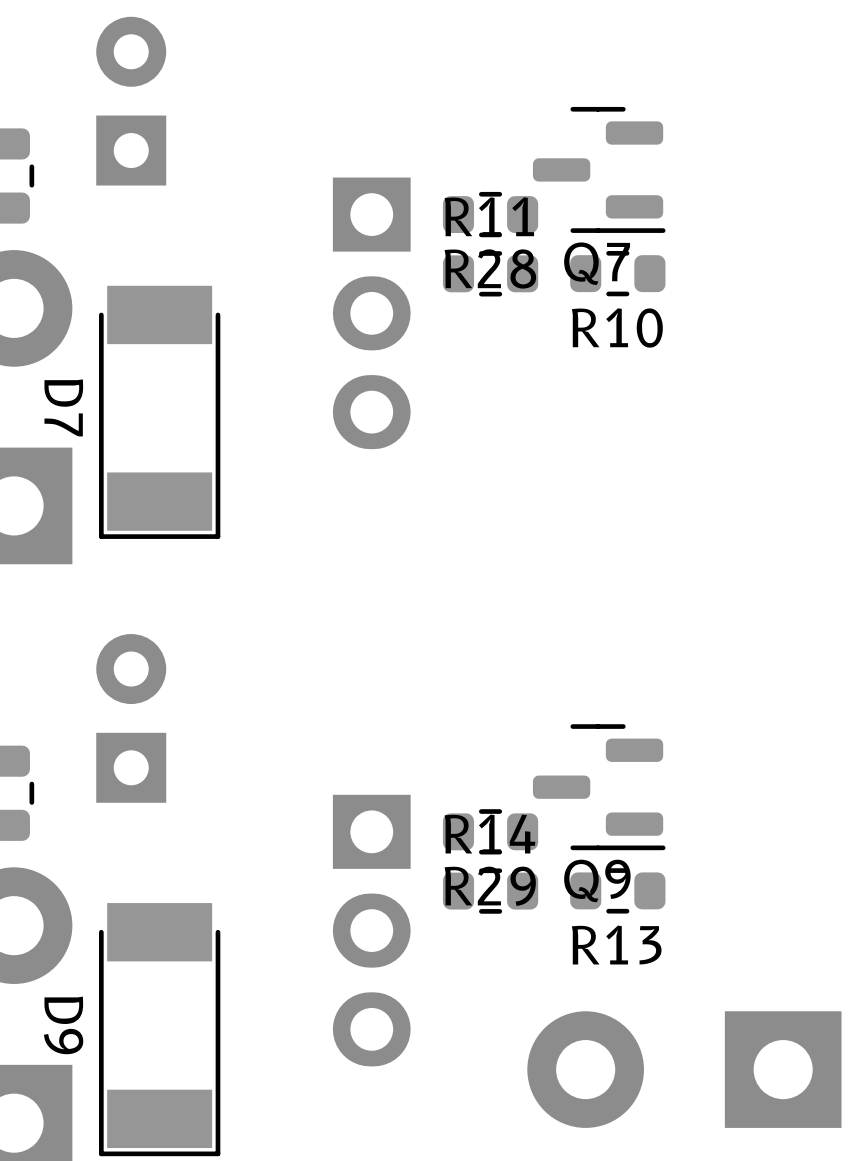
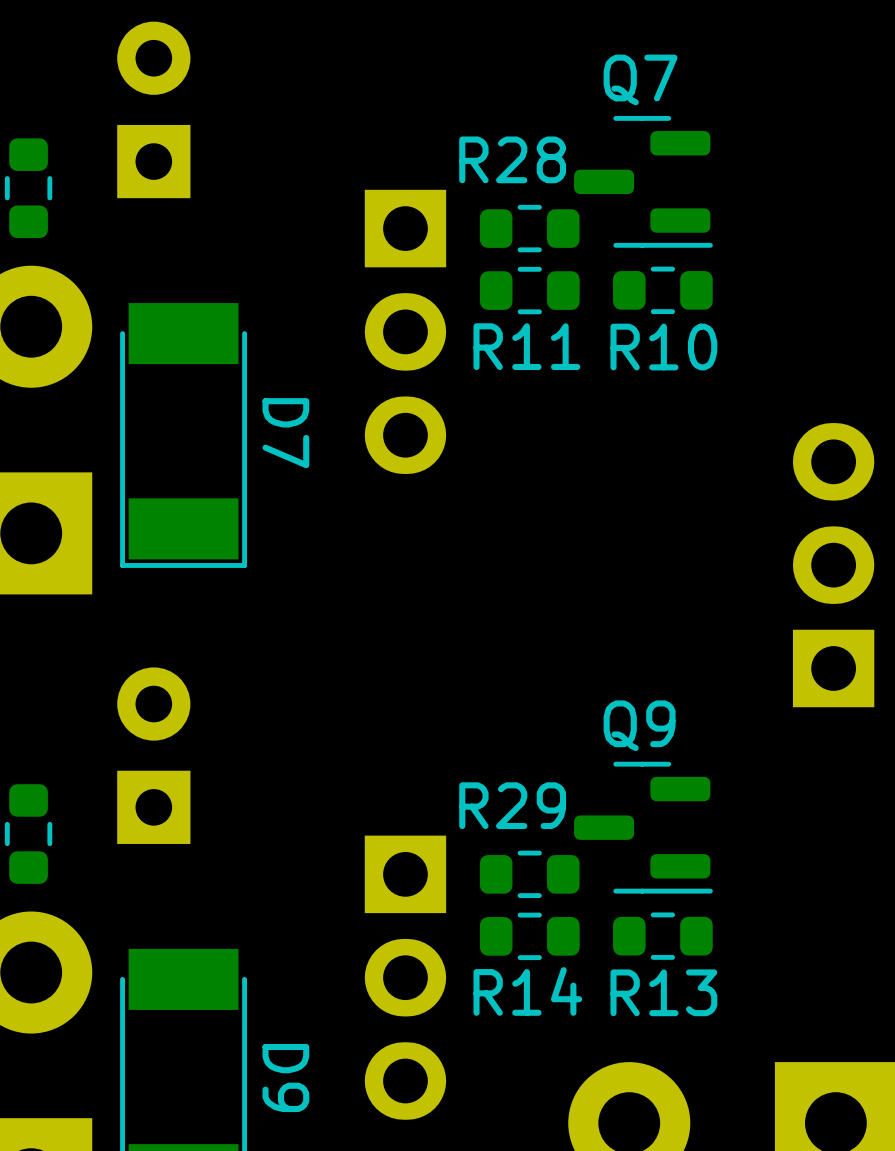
R11 name position: R11 (489, 216) -> R11 (526, 346)
Q7 name position: Q7 (597, 263) -> Q7 (640, 79)
R28 name position: R28 (490, 268) -> R28 (512, 159)
D7 name position: D7 (63, 407) -> D7 (285, 433)
part: none -> (833, 565)
R14 name position: R14 (490, 834) -> R14 (527, 991)
Q9 name position: Q9 (597, 880) -> Q9 (639, 725)
R29 name position: R29 (490, 886) -> R29 (512, 805)
D9 name position: D9 (63, 1025) -> D9 (285, 1077)

